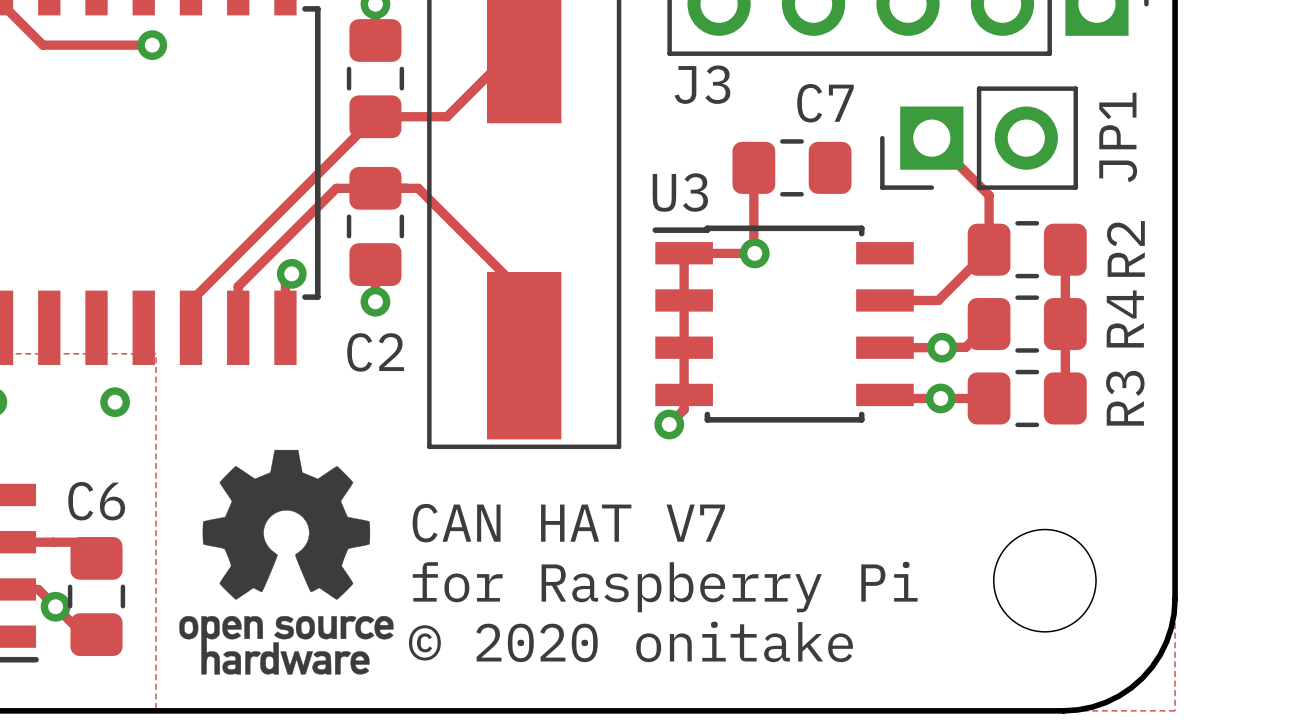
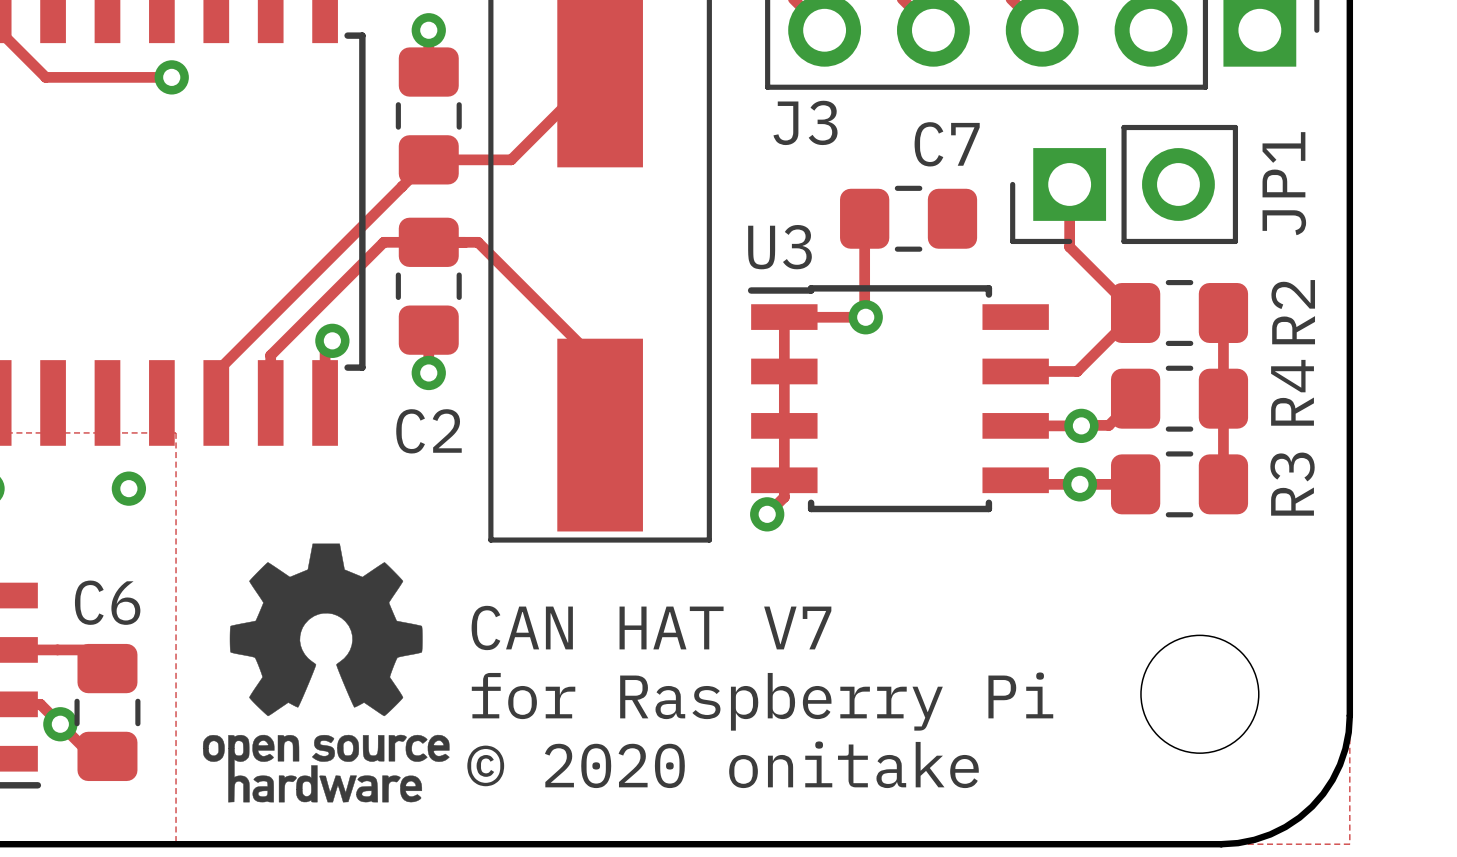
track: (931, 138) (989, 195) (989, 249) -> (1069, 184) (1069, 247) (1135, 313)

